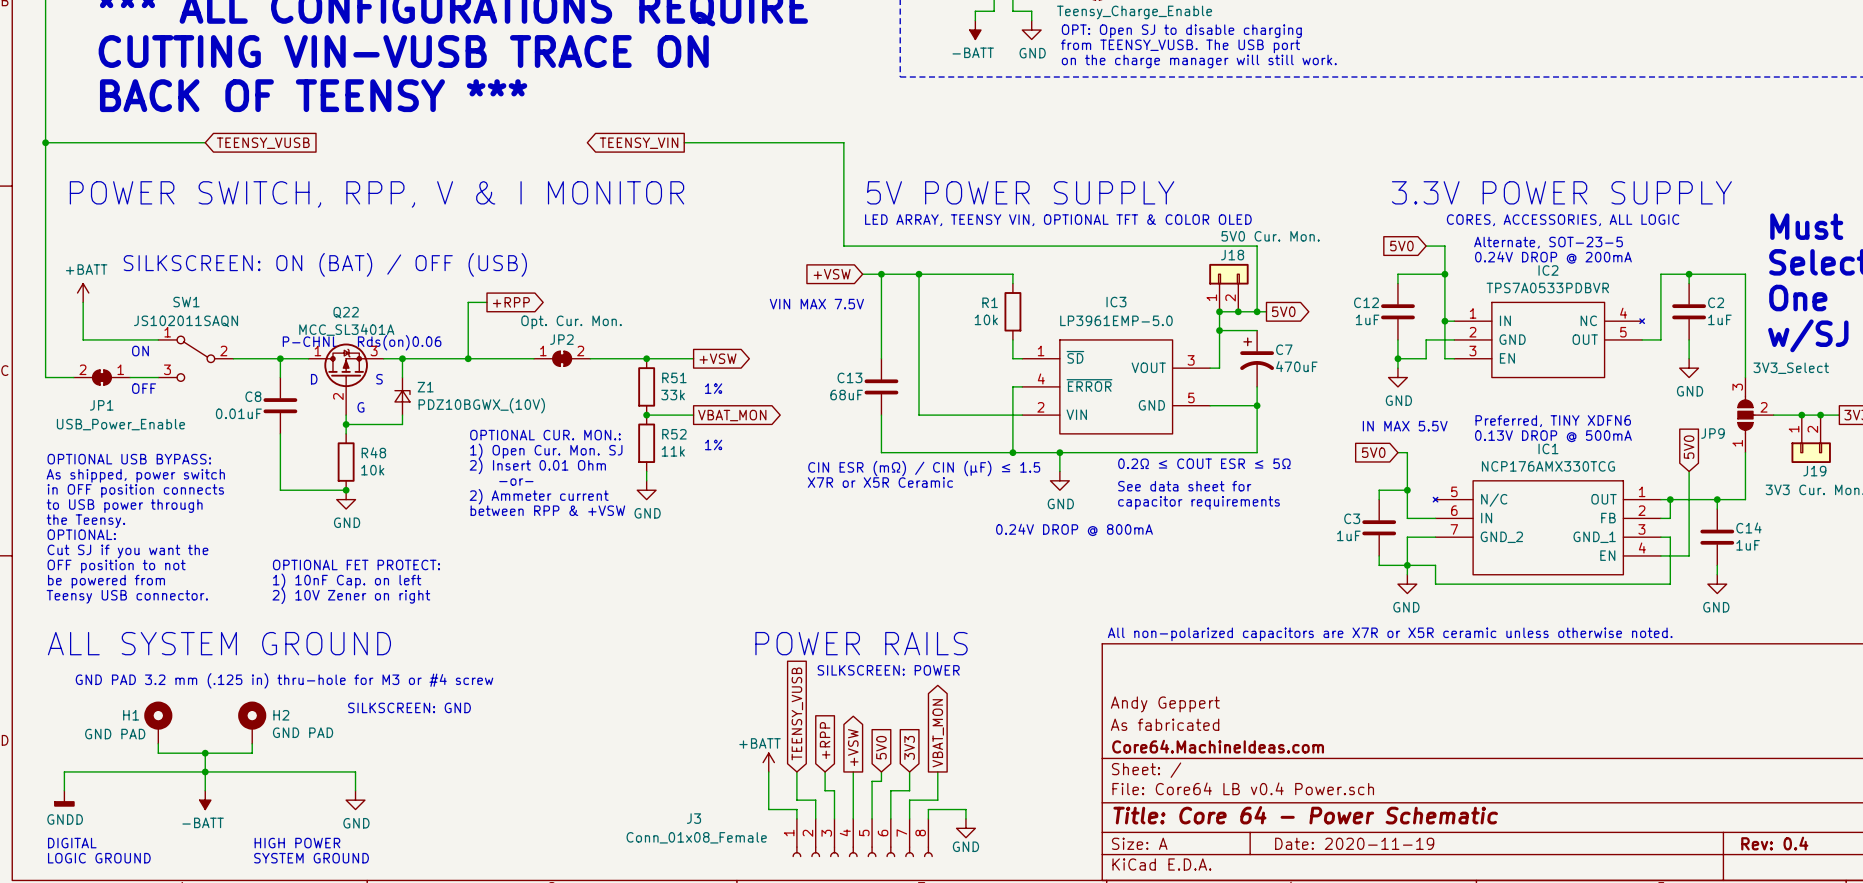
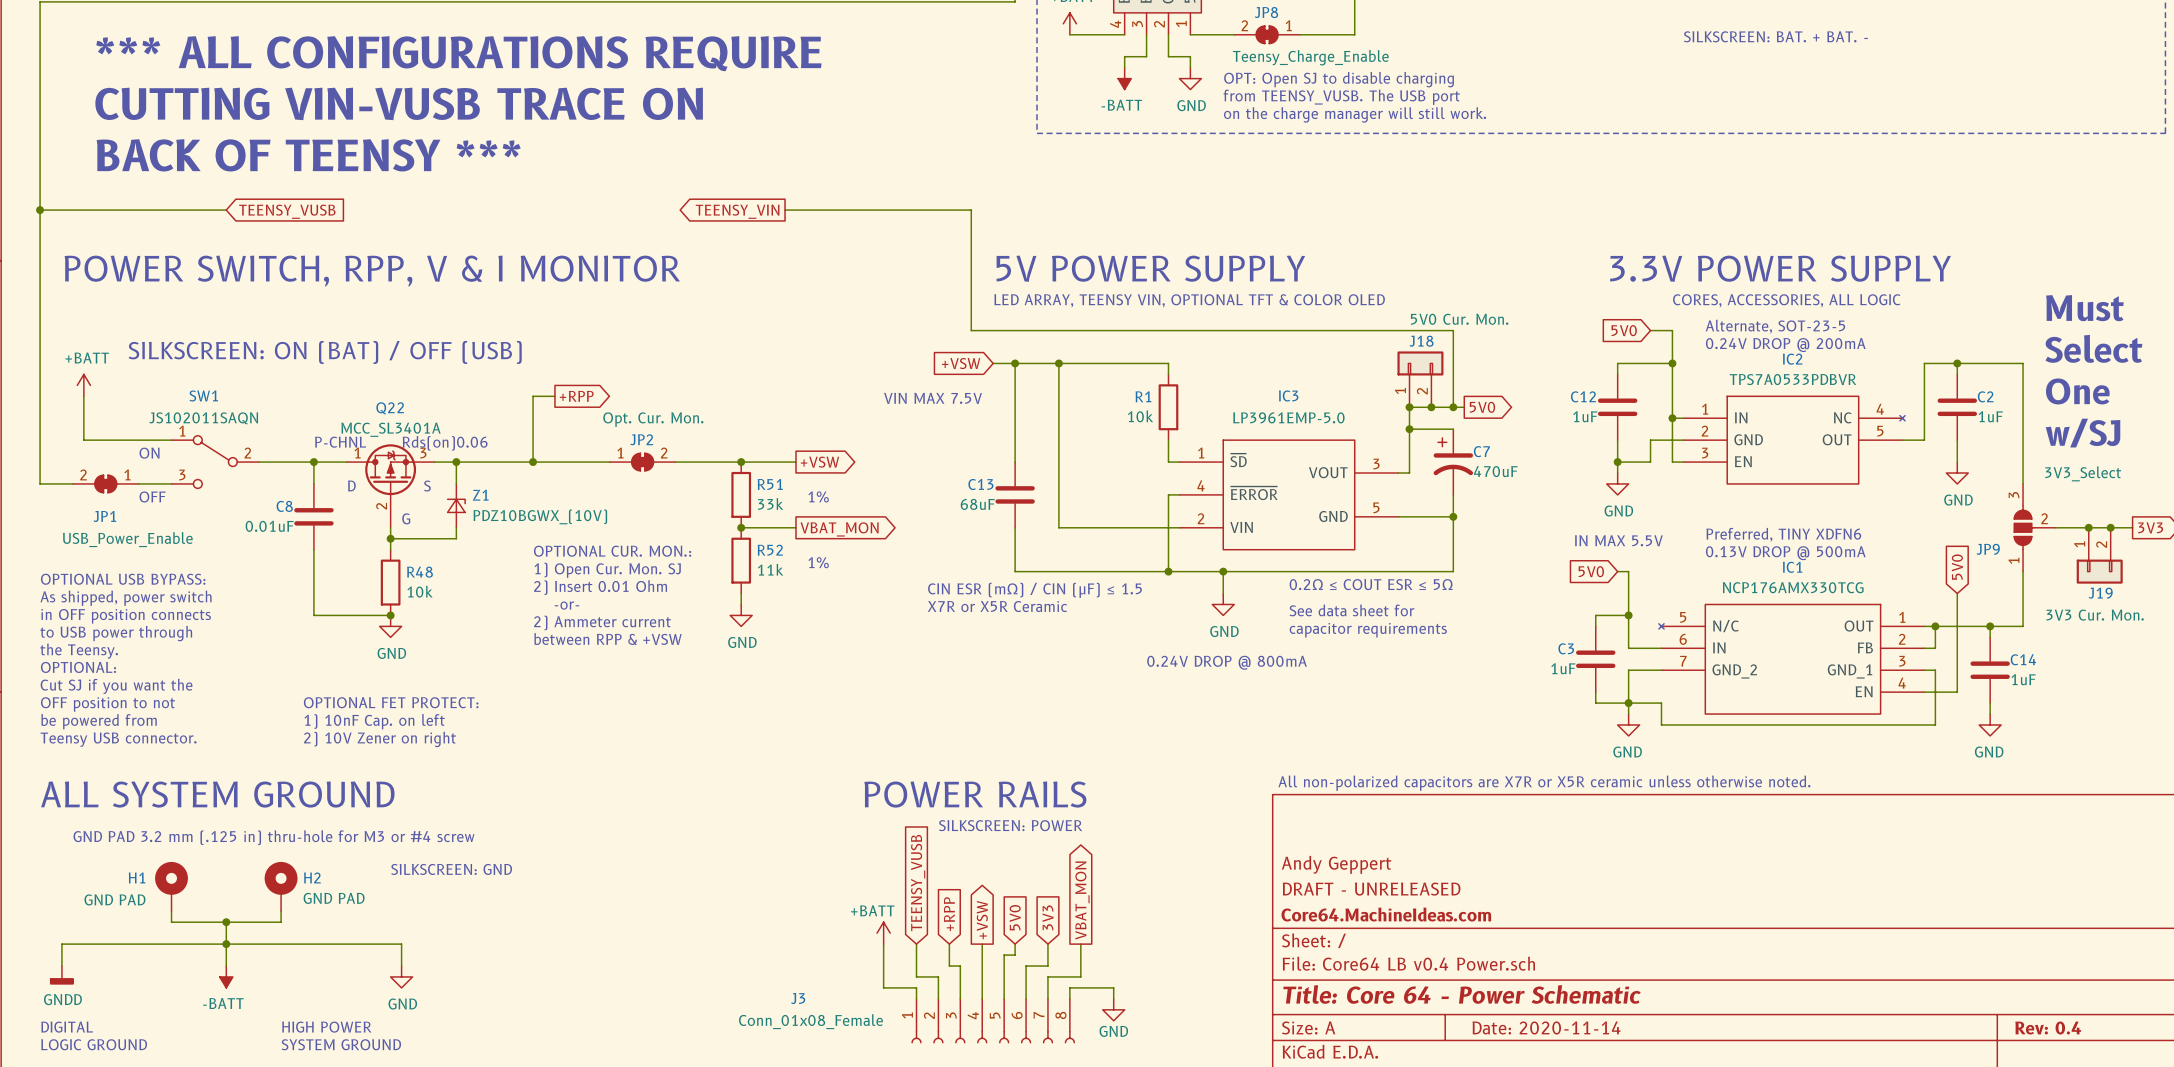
title block: As fabricated (1165, 724) -> DRAFT - UNRELEASED (1371, 889)
title block: Date: 2020-11-19 (1354, 843) -> Date: 2020-11-14 (1546, 1027)

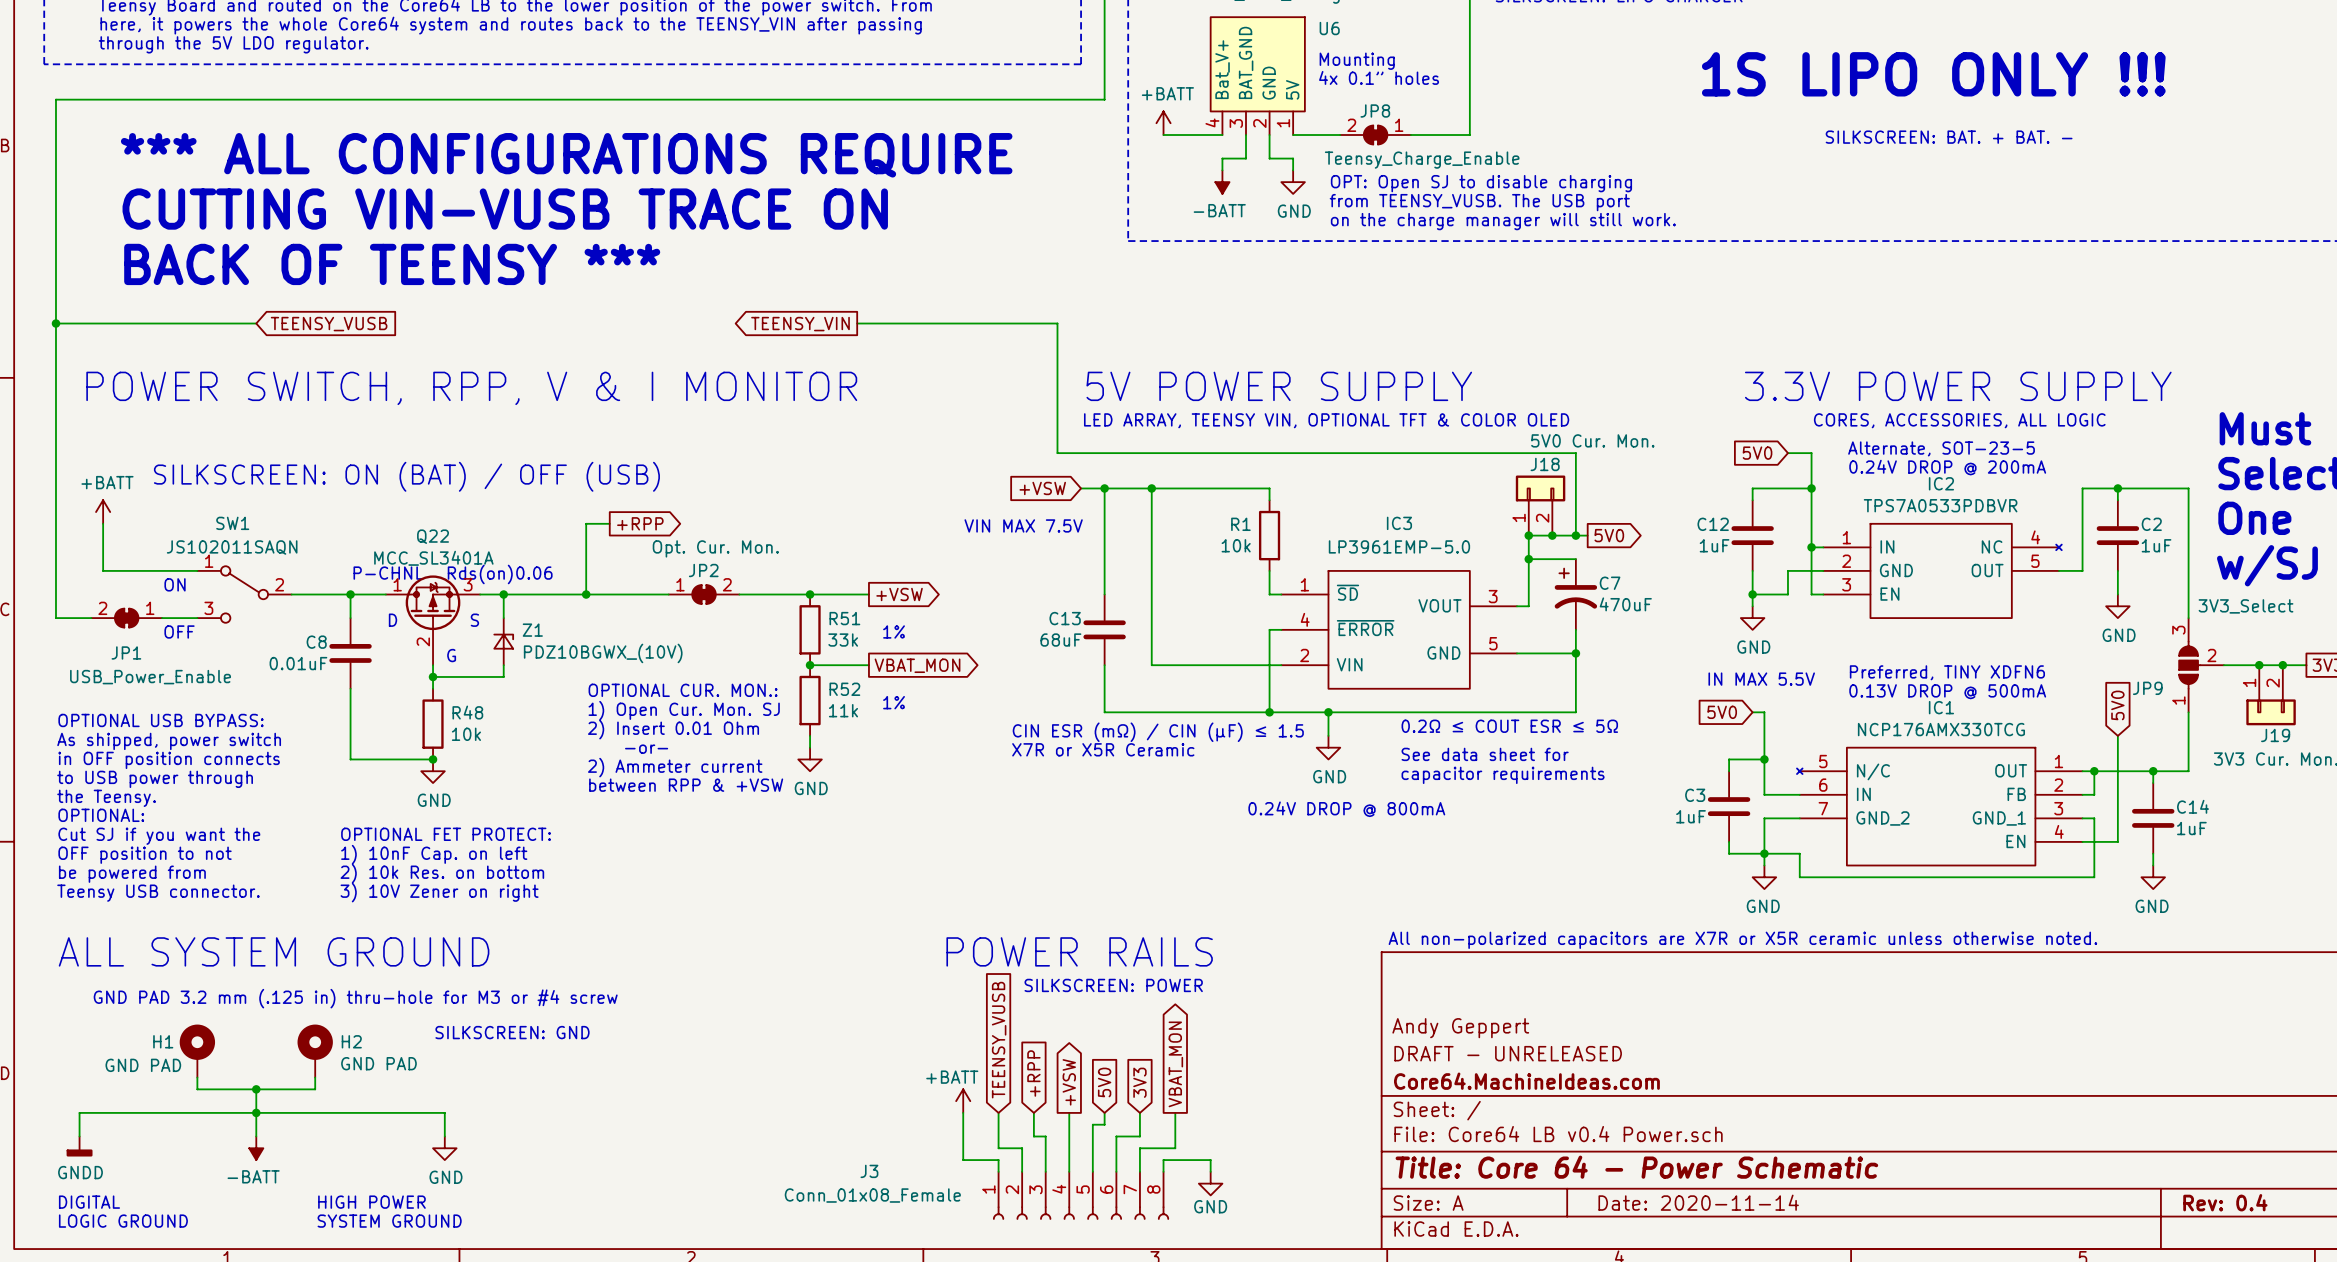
text: none -> OPTIONAL FET PROTECT: (446, 834)
text: OPTIONAL FET PROTECT: (391, 702) -> 1) 10nF Cap. on left (434, 854)
text: 1) 10nF Cap. on left (374, 721) -> 2) 10k Res. on bottom (442, 873)
text: 2) 10V Zener on right (380, 739) -> 3) 10V Zener on right (439, 892)

